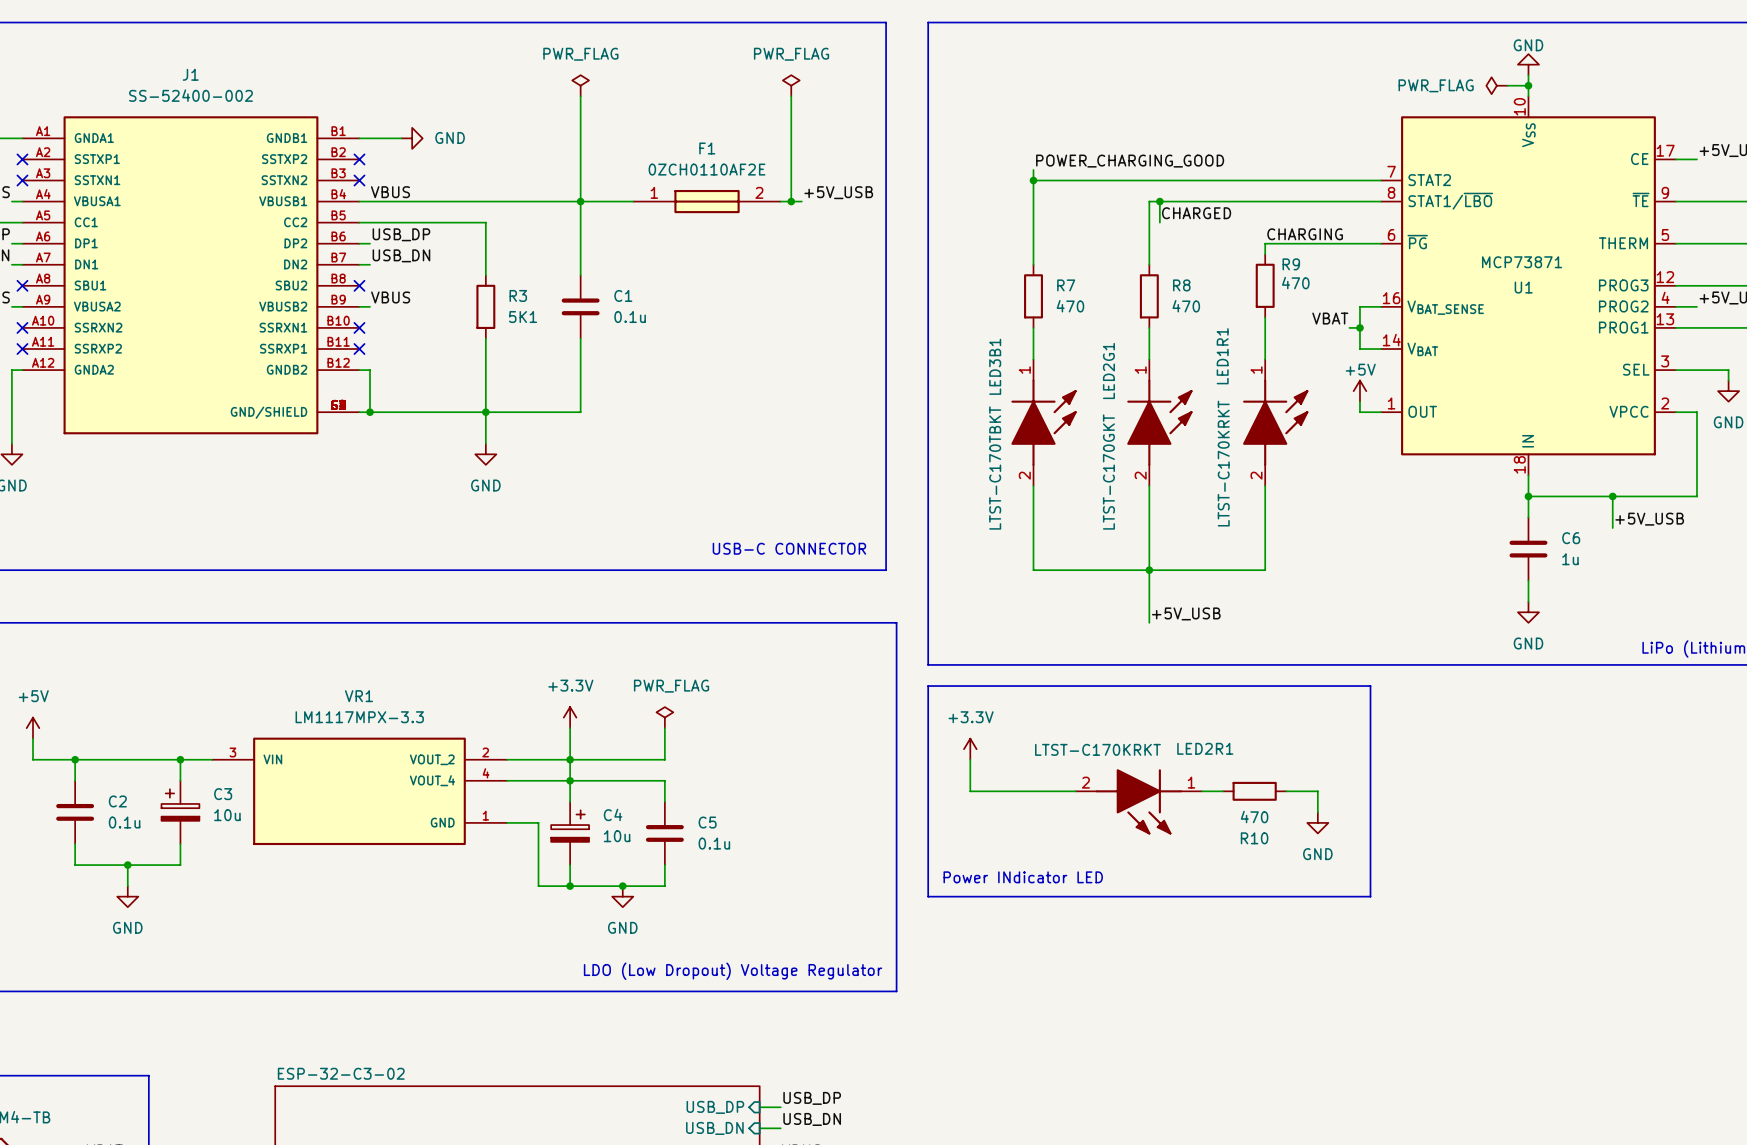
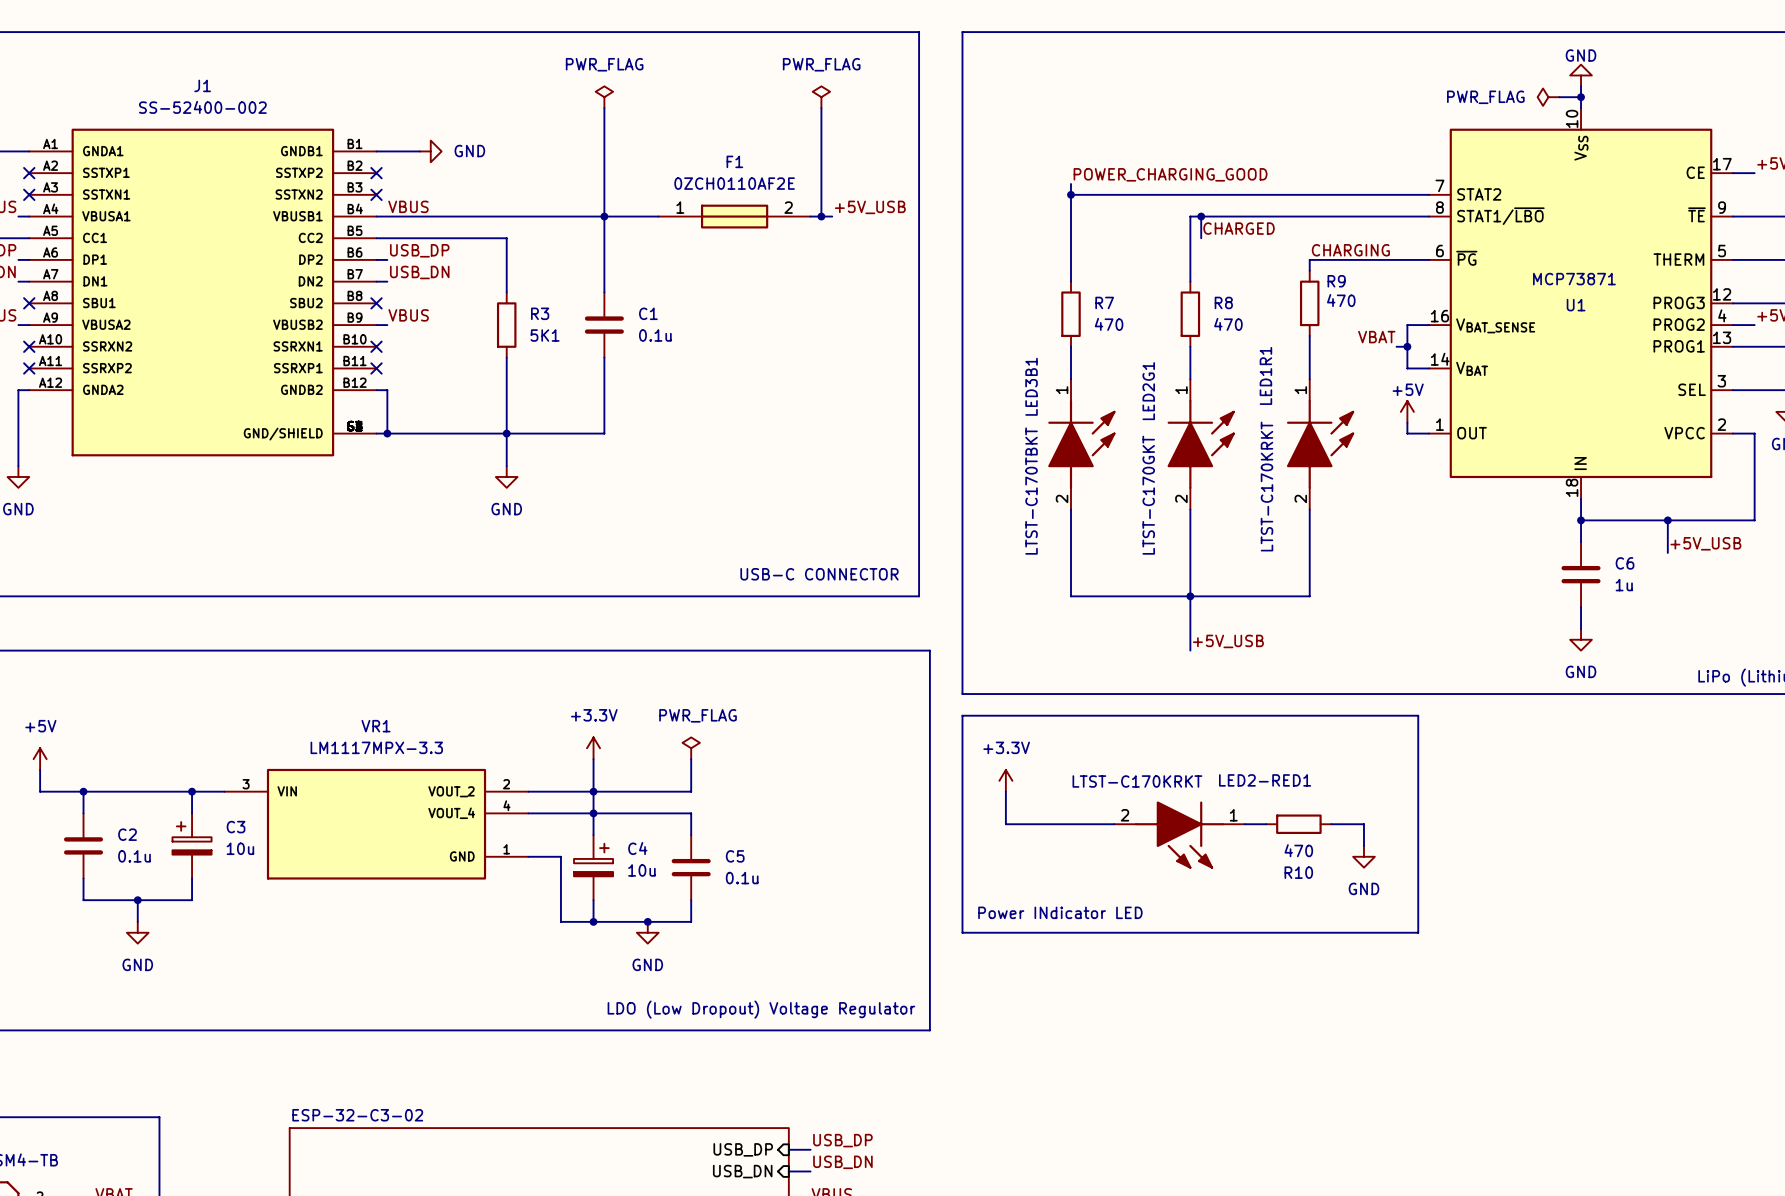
LED2R1 name: LED2R1 (1205, 748) -> LED2-RED1 (1265, 780)

